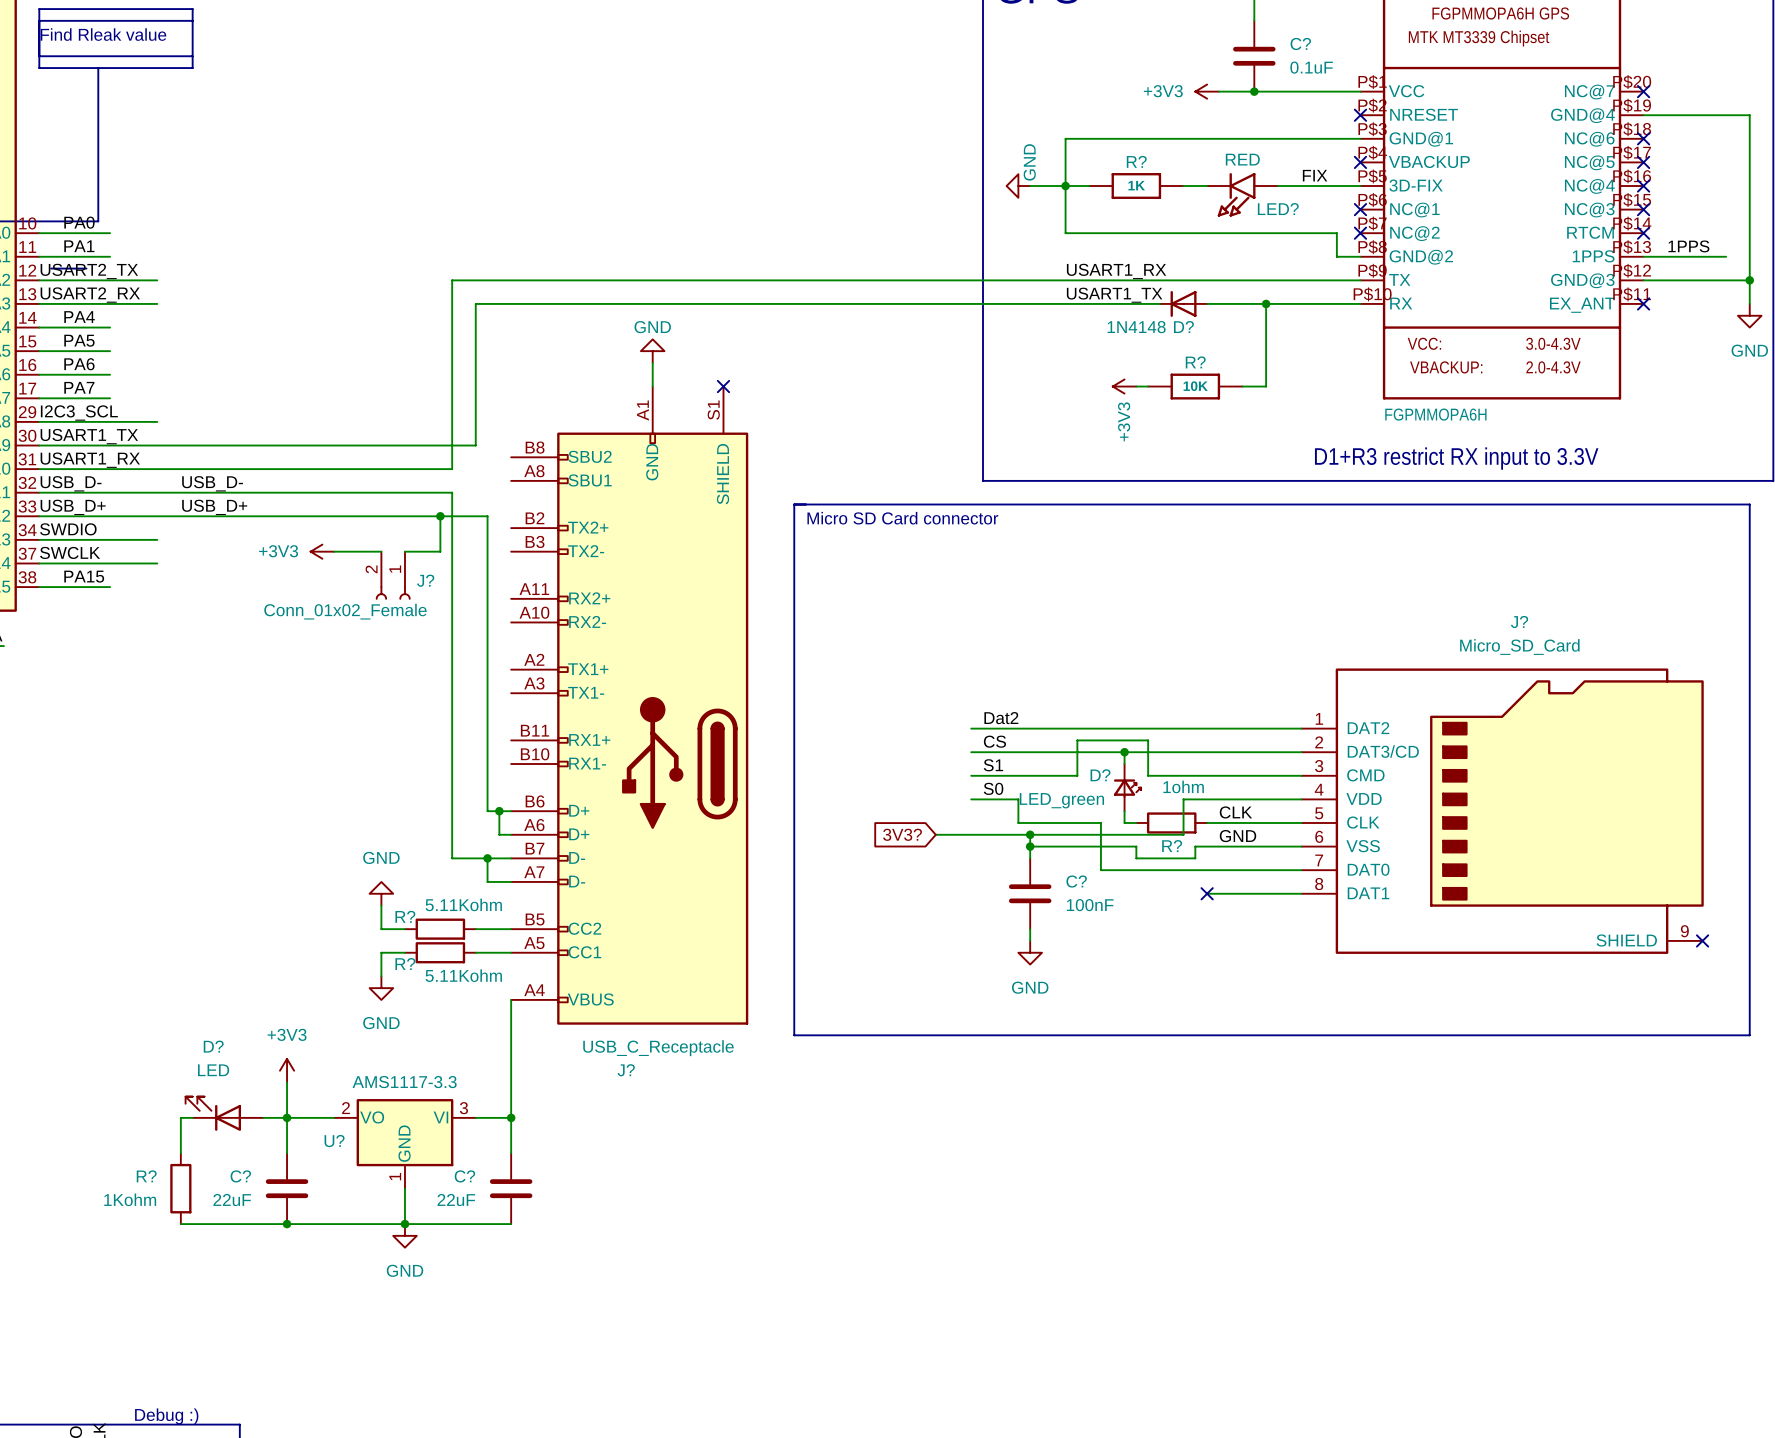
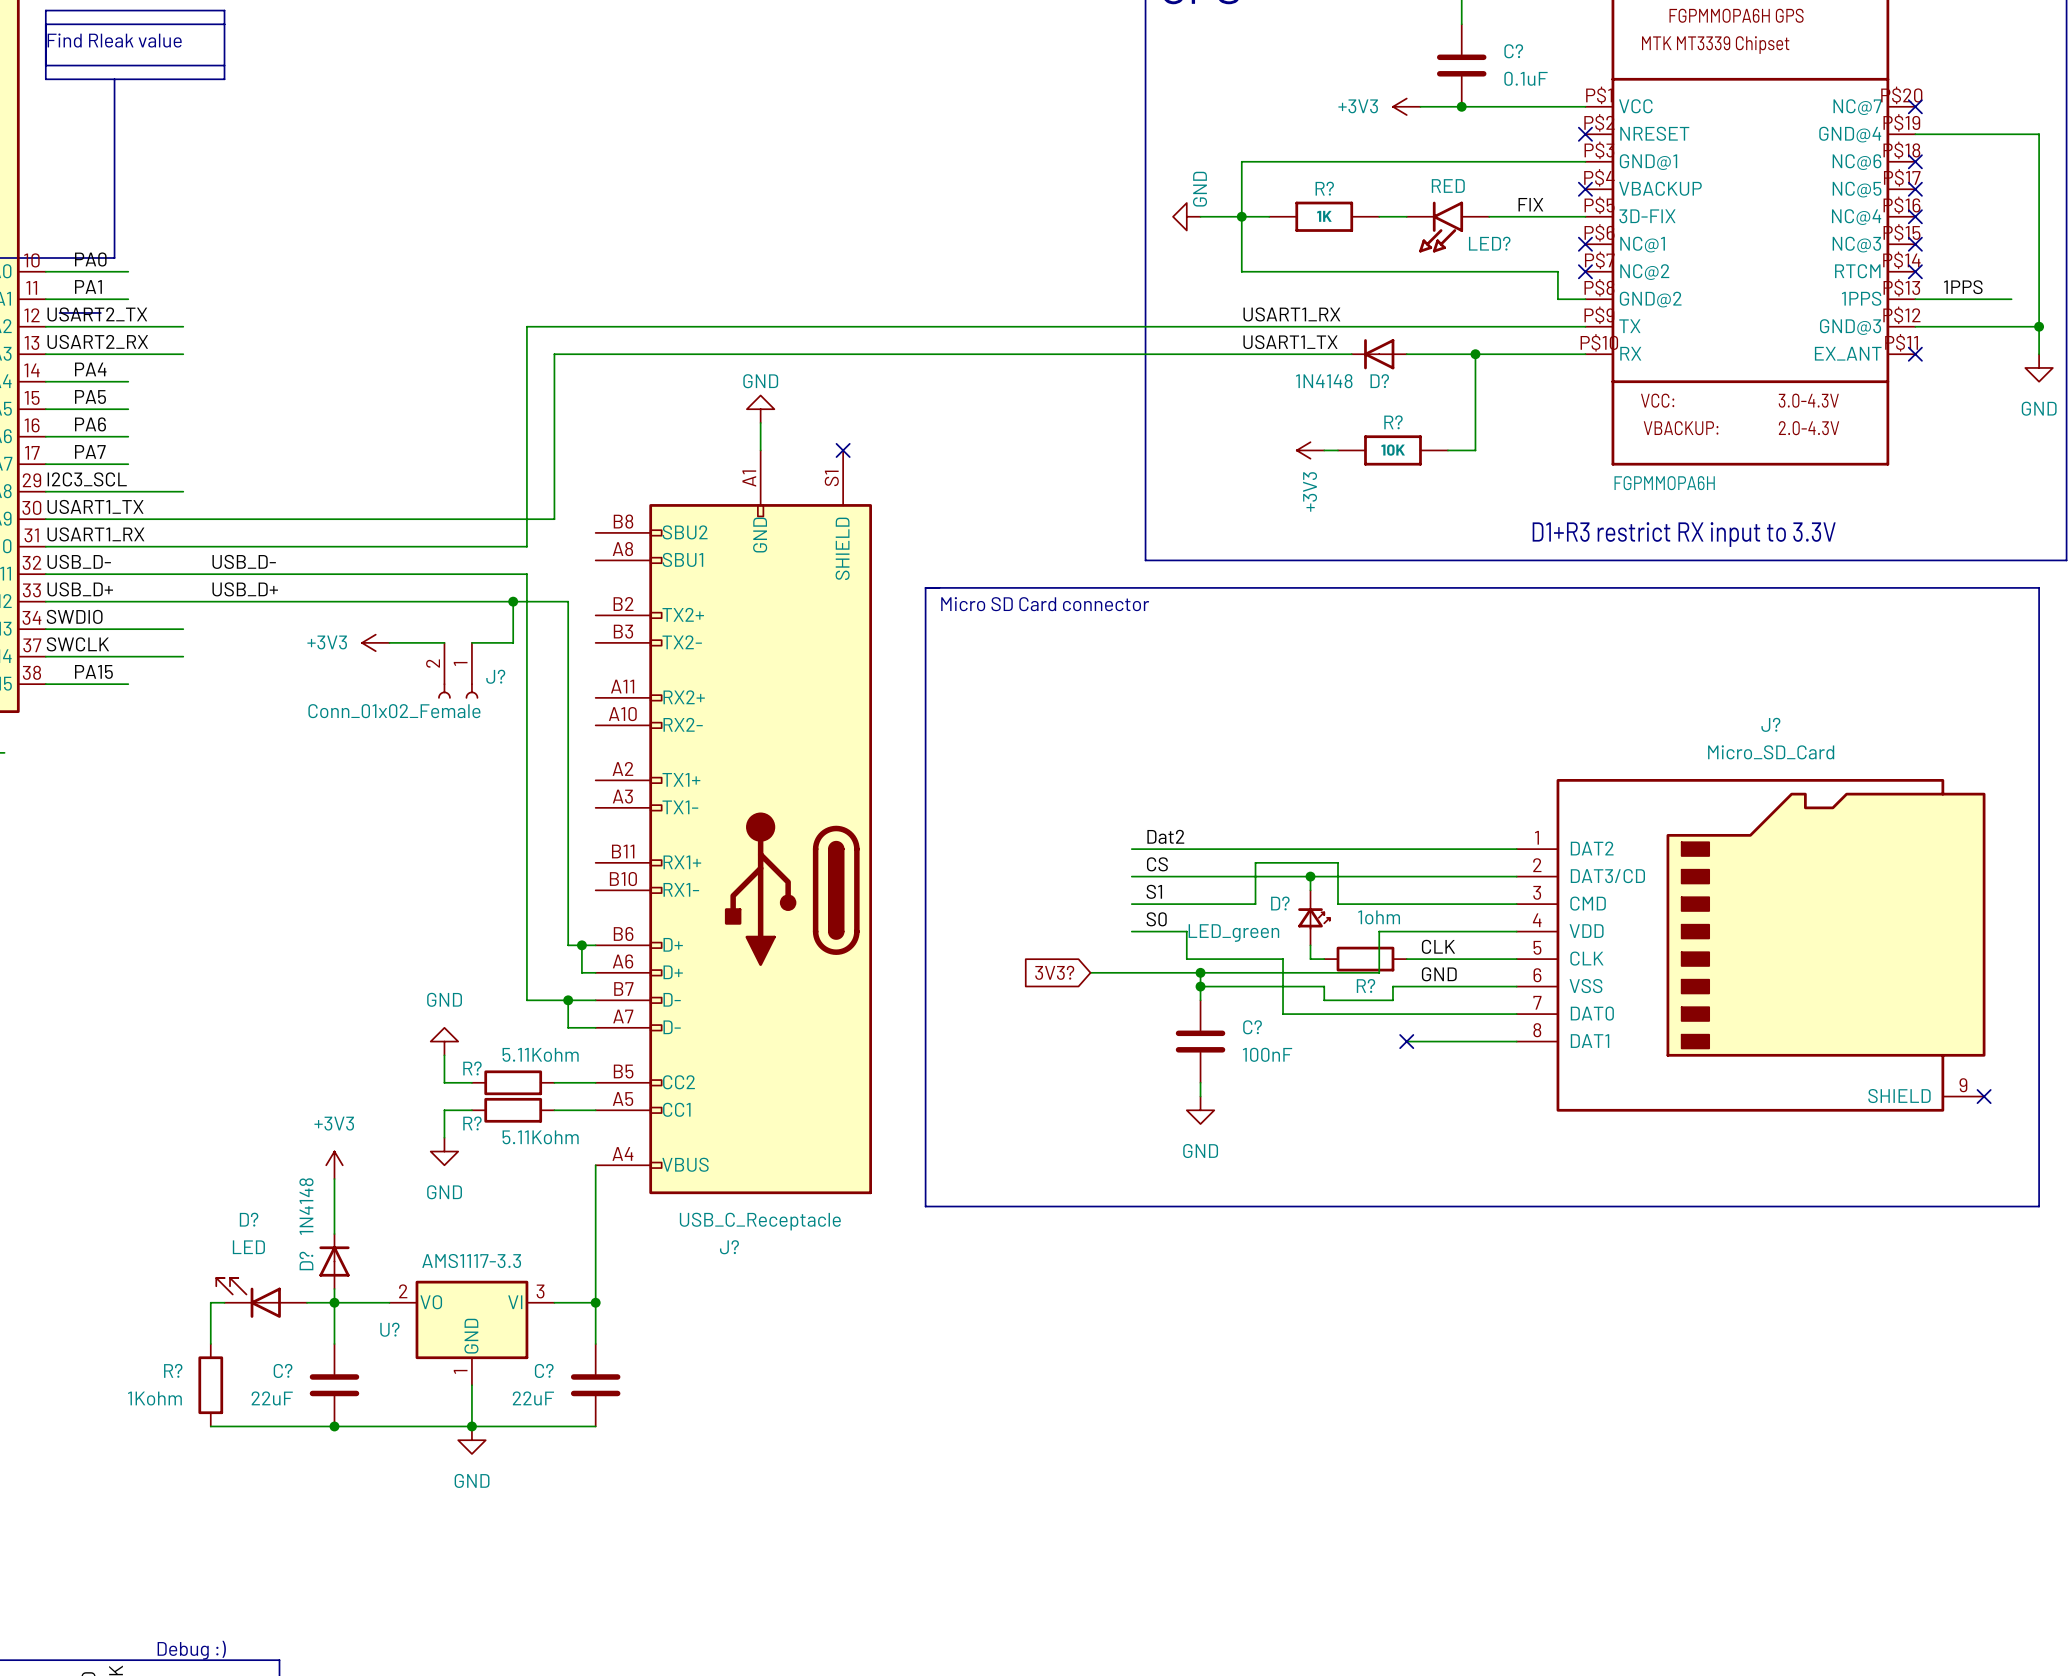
wire: none -> (334, 1179) (334, 1234)
power symbol position: +3V3 (287, 1070) -> +3V3 (334, 1165)
D?: none -> 1N4148 (334, 1261)

